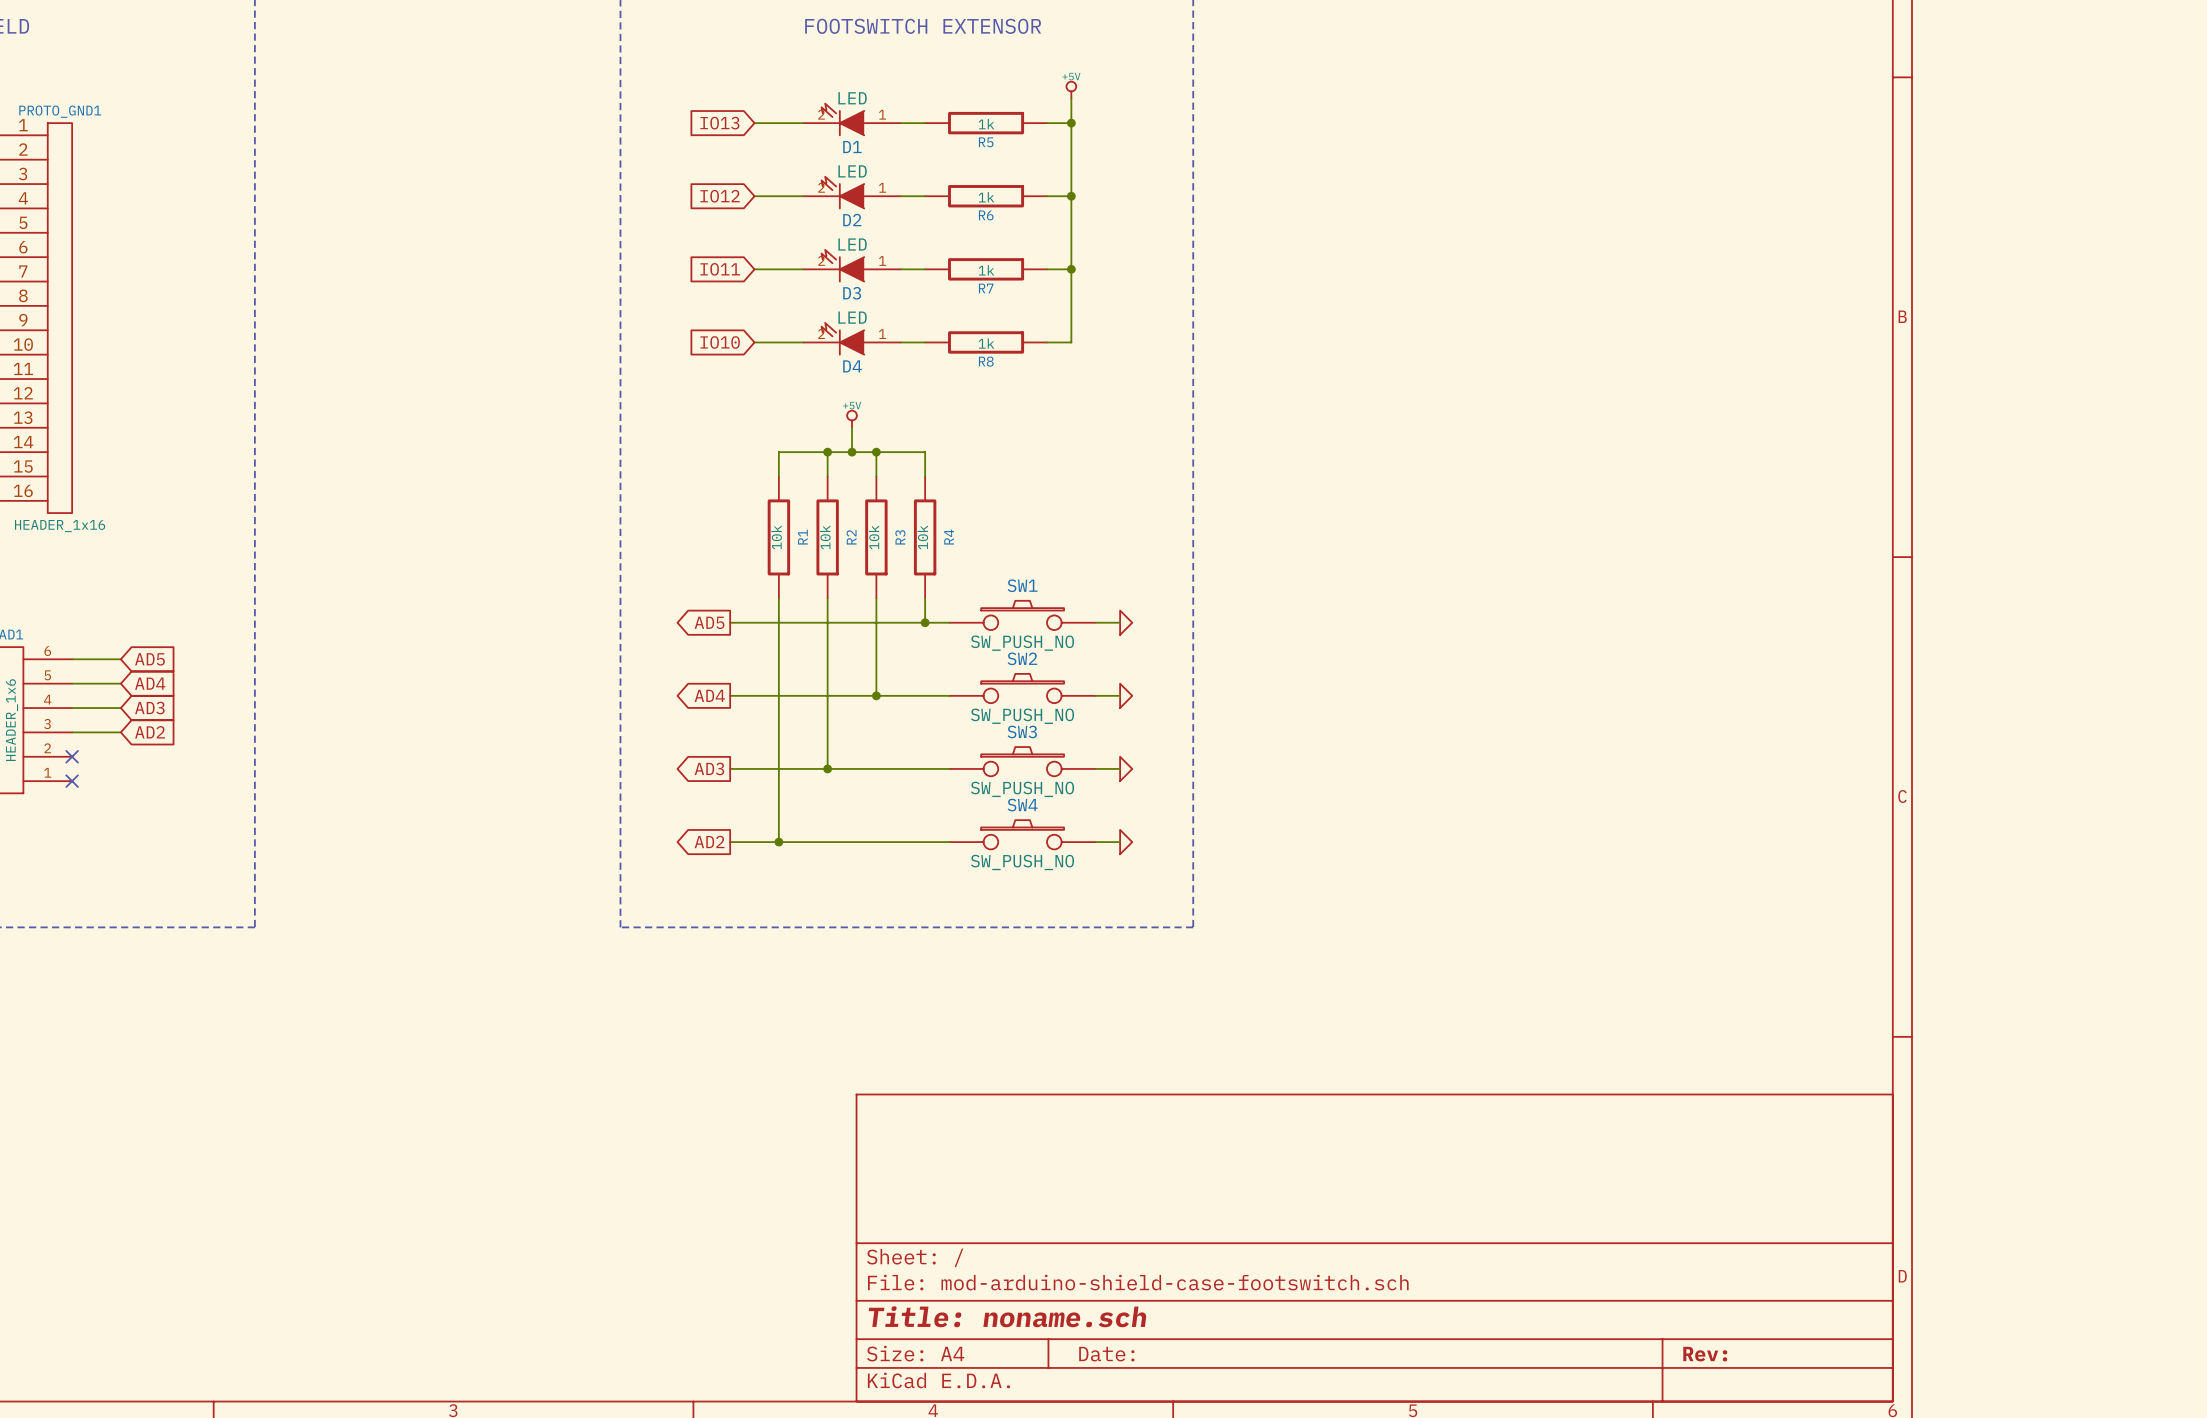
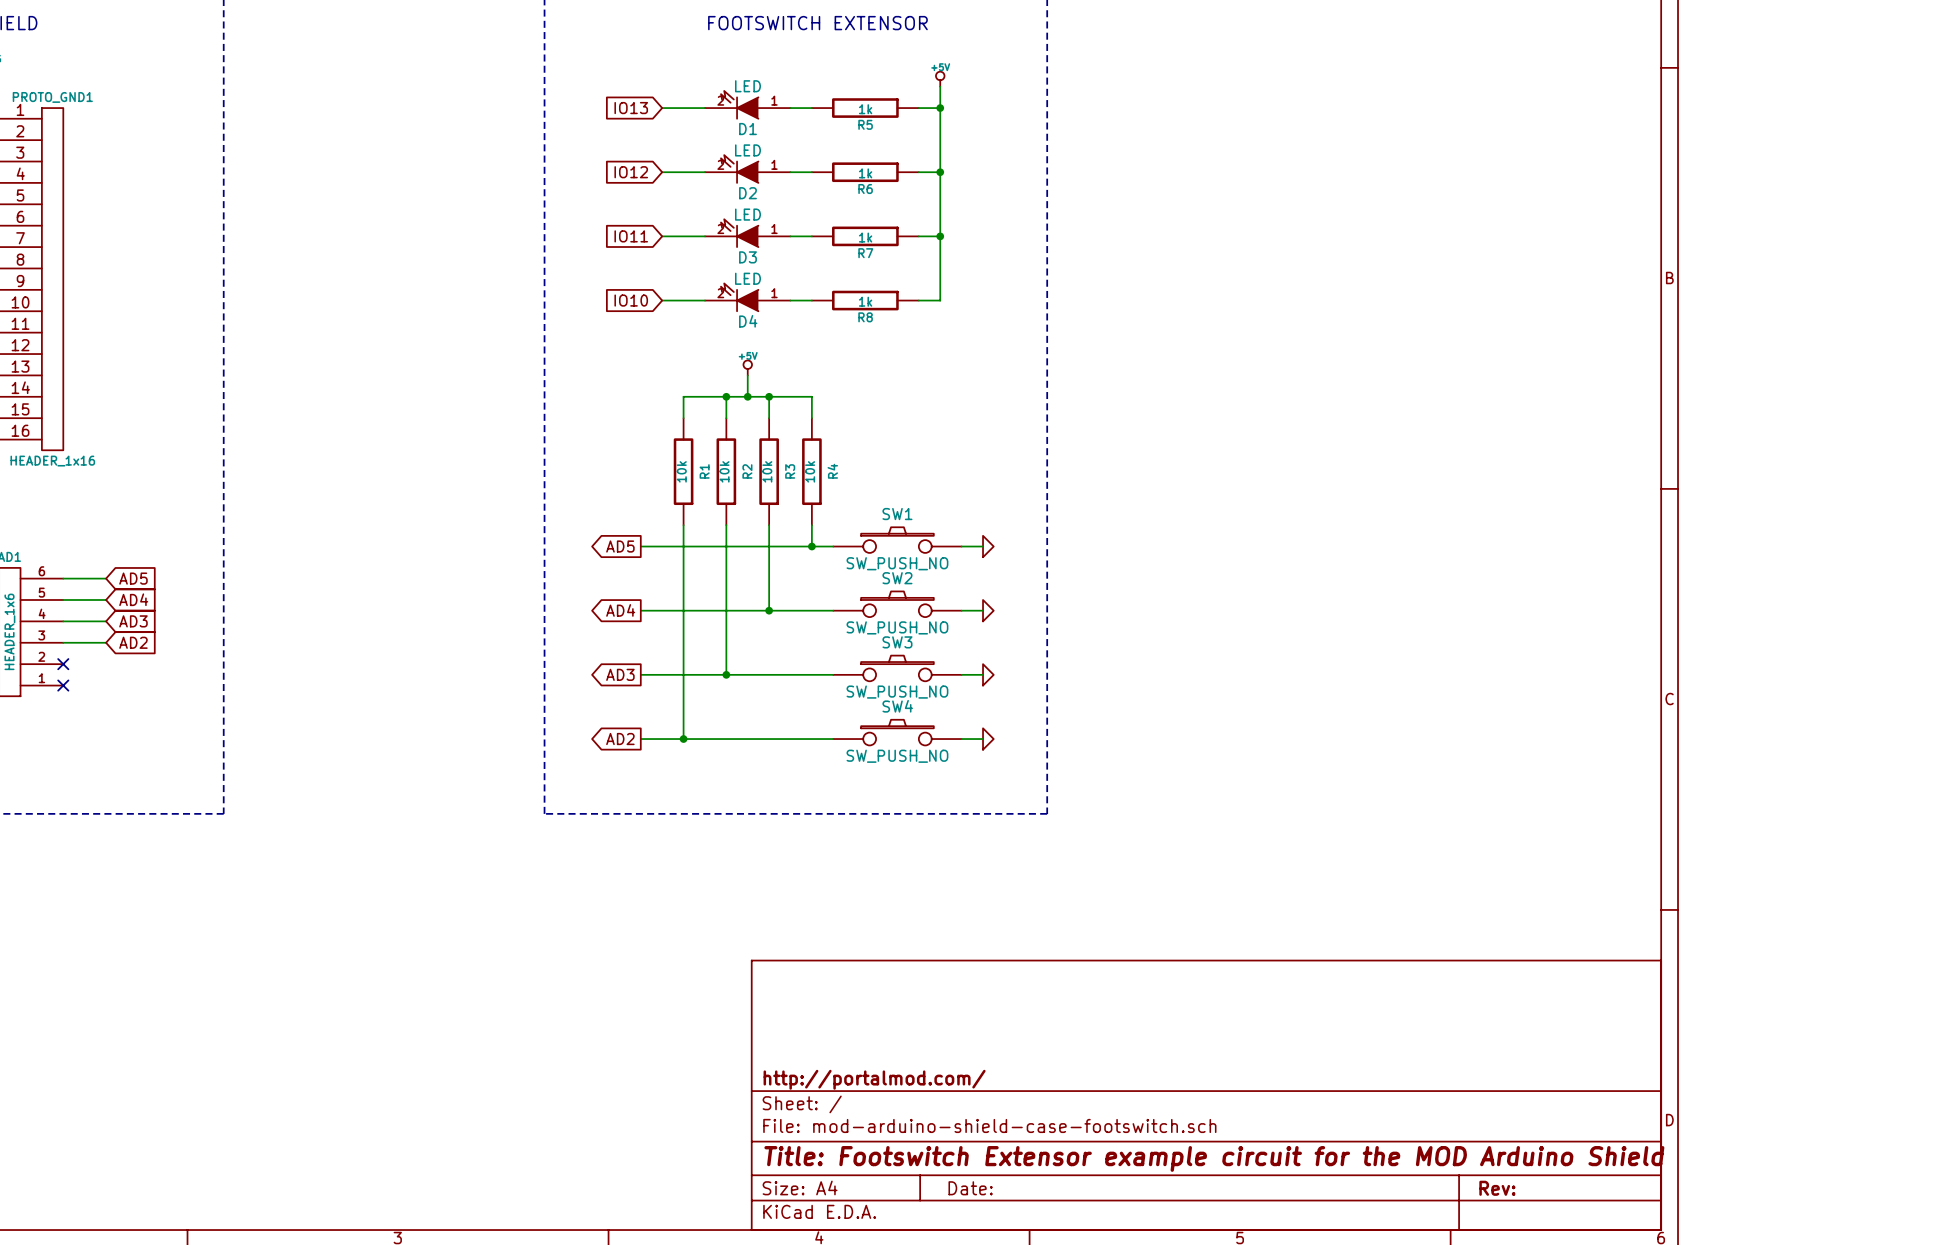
title block: none -> http://portalmod.com/ (874, 1079)
title block: Title: noname.sch (1007, 1316) -> Title: Footswitch Extensor example circuit for the MOD Arduino Shield (1214, 1158)

